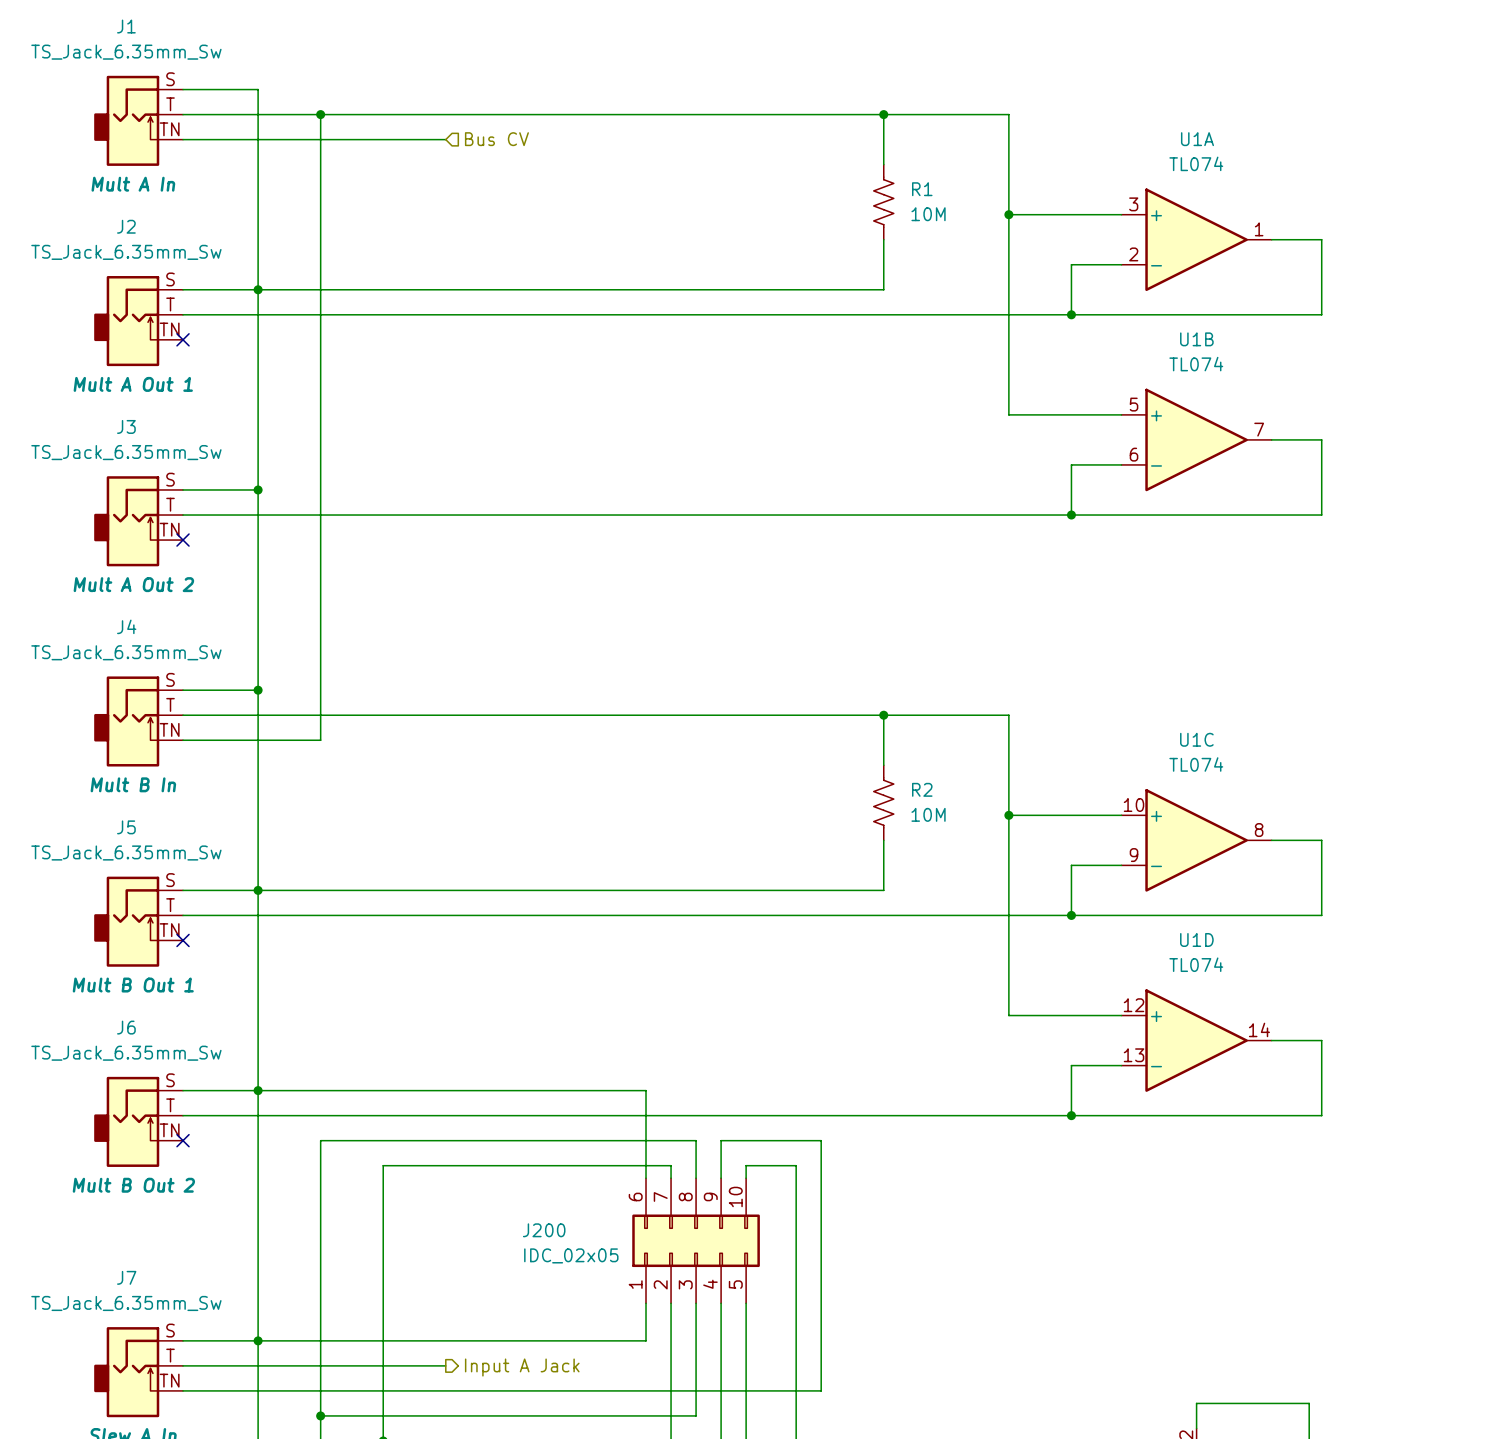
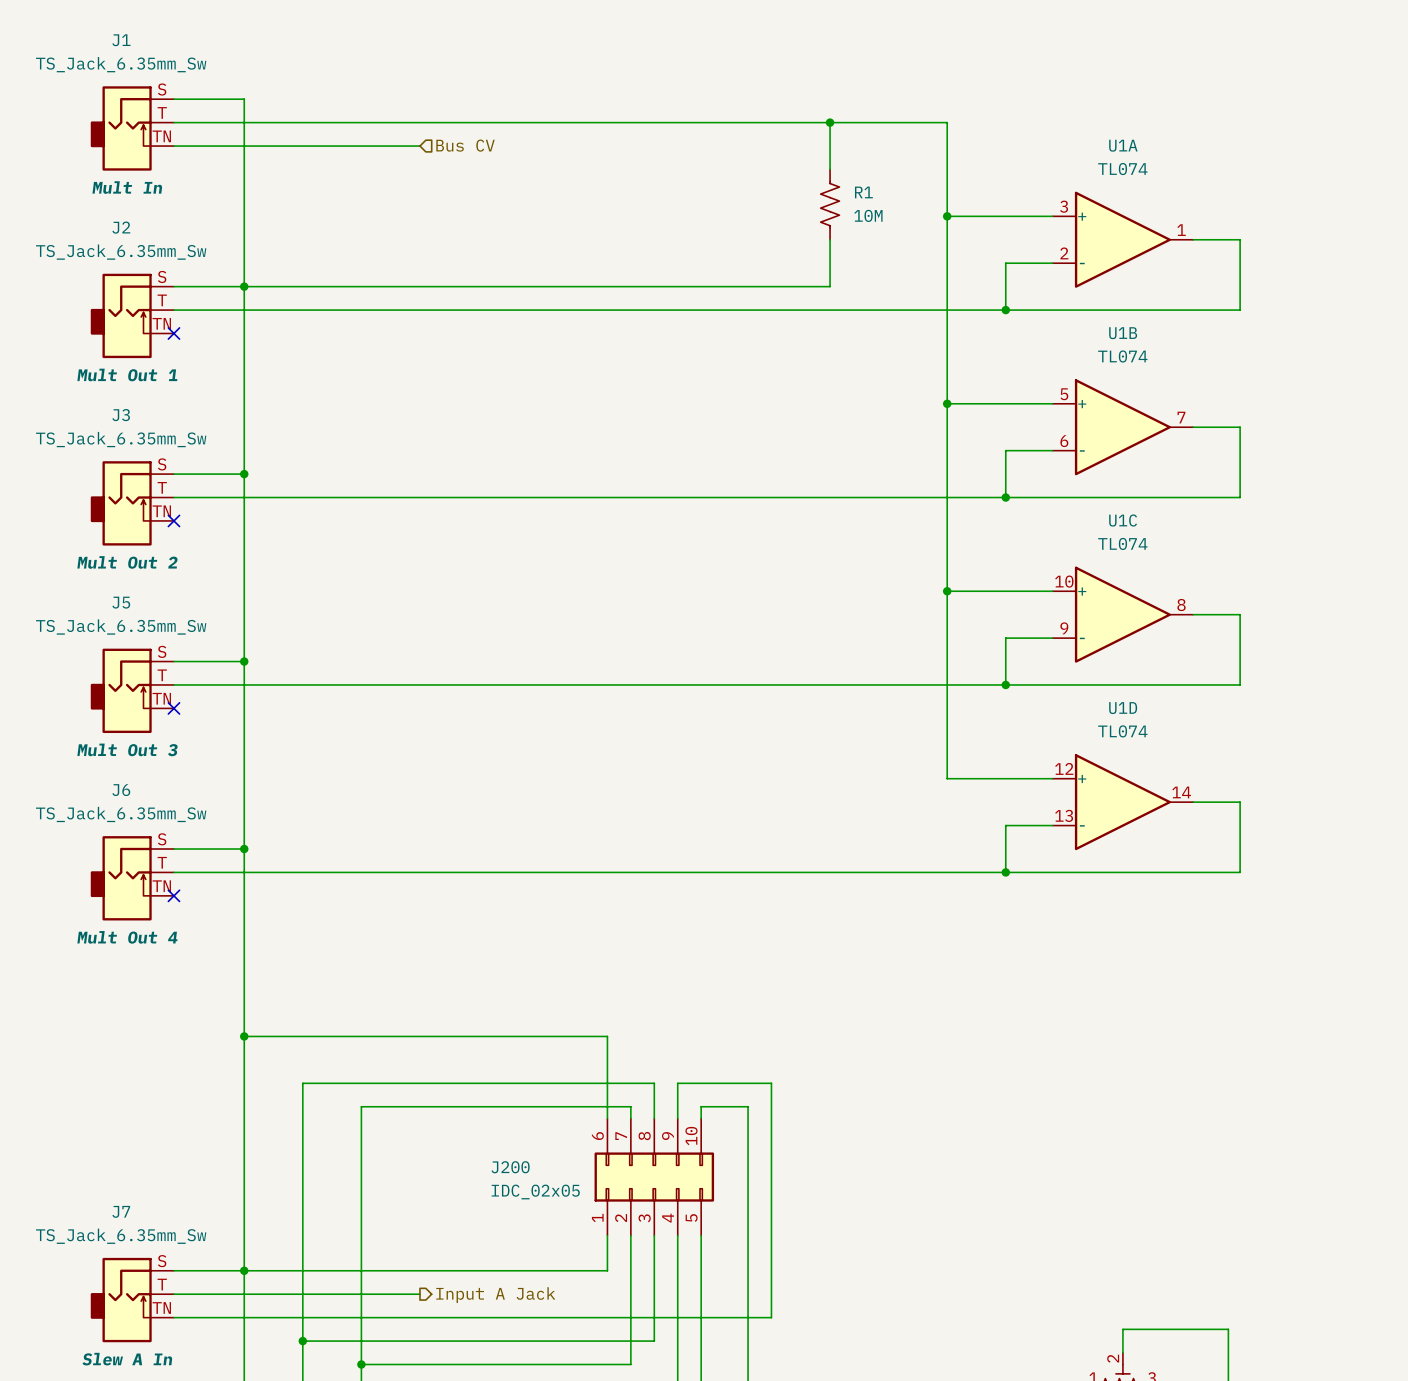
wire: (320, 114) (320, 740) (183, 740) -> none
junction: (320, 114) -> none
J1 text: Mult A In (133, 184) -> Mult In (127, 187)
J2 text: Mult A Out 1 (133, 384) -> Mult Out 1 (127, 374)
wire: none -> (947, 403) (947, 684) (1240, 684) (1240, 614) (1193, 614)
junction: none -> (947, 403)
J3 text: Mult A Out 2 (133, 584) -> Mult Out 2 (127, 562)
wire: none -> (947, 591) (1052, 591)
junction: none -> (947, 591)
J4 name: J4 (126, 626) -> J5 (121, 602)
wire: none -> (1052, 638) (1005, 638) (1005, 684)
wire: (883, 715) (883, 765) -> none
junction: (883, 715) -> none
junction: none -> (1005, 684)
no-connect mark: none -> (173, 708)
J4 text: Mult B In (133, 784) -> Mult Out 3 (127, 749)
R2: 10M (883, 802) -> none
wire: (1008, 815) (1008, 1015) (1121, 1015) -> none
junction: (1008, 815) -> none
J5 name: J5 (126, 827) -> J6 (121, 790)
wire: (883, 840) (883, 890) (258, 890) -> none
U1C position: (1196, 840) -> (1122, 614)
J5 text: Mult B Out 1 (133, 985) -> Mult Out 4 (127, 937)
U1D position: (1196, 1040) -> (1122, 802)
wire: (1271, 1040) (1321, 1040) (1321, 1115) (183, 1115) -> none
wire: (1121, 1065) (1071, 1065) (1071, 1115) -> none
wire: (183, 1090) (258, 1090) -> none
junction: (1071, 1115) -> none
J6: TS_Jack_6.35mm_Sw (138, 1121) -> none
no-connect mark: (183, 1140) -> none

